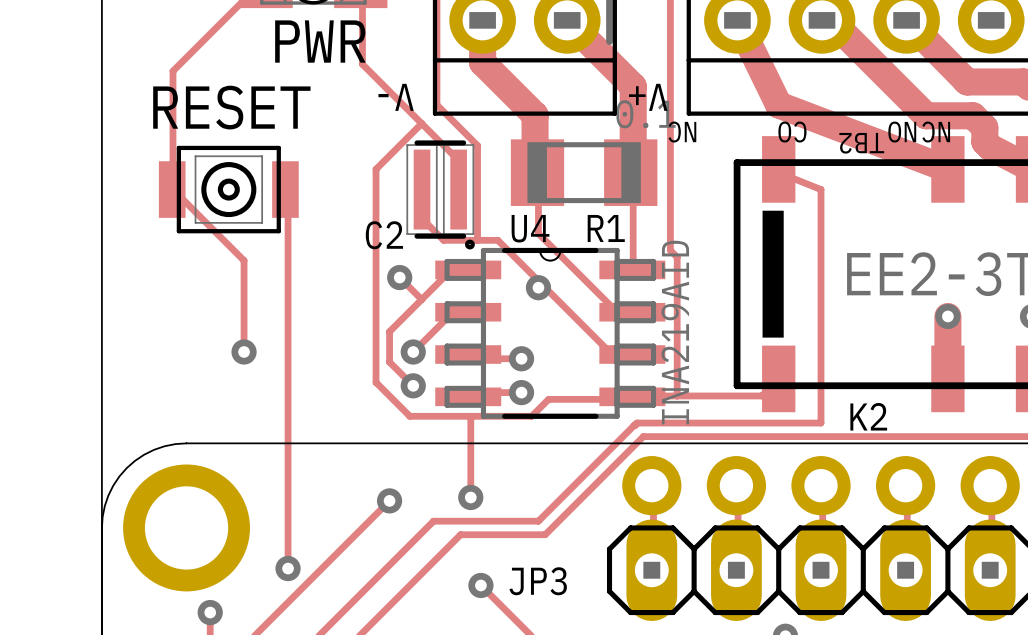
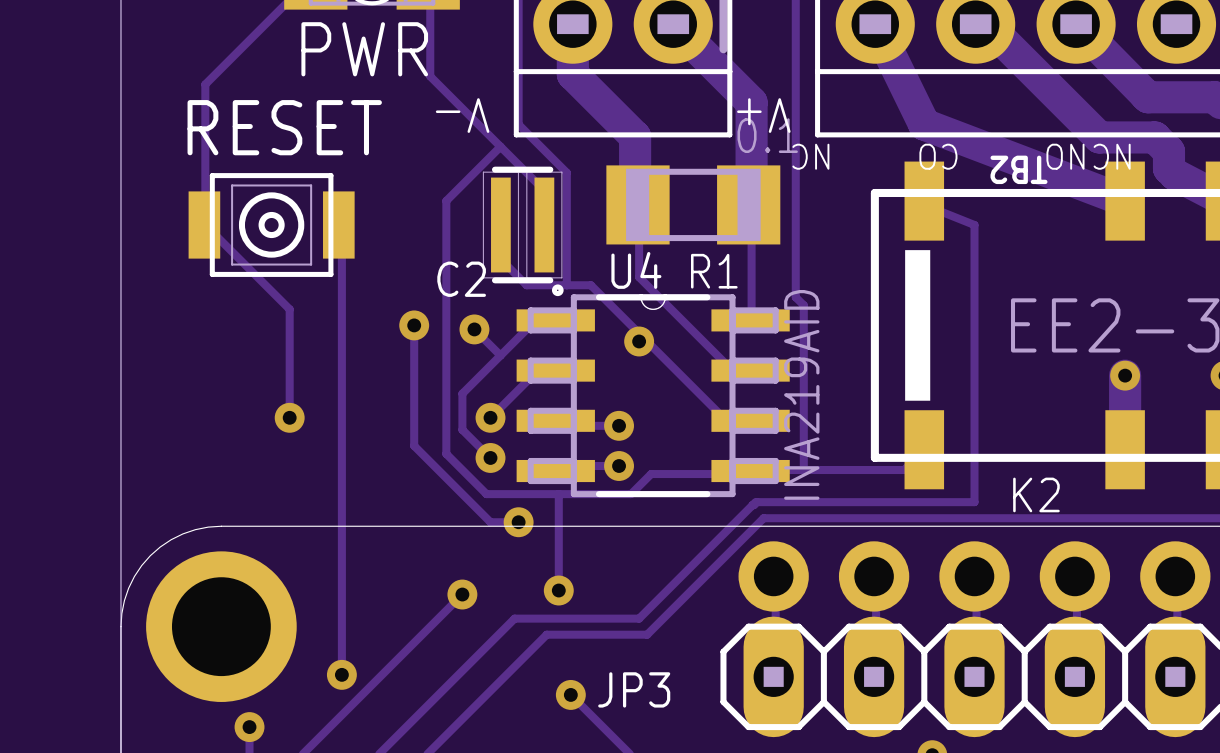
track: none -> (414, 325) (414, 445) (490, 522) (518, 522)
via: none -> (414, 325)
via: none -> (518, 522)

